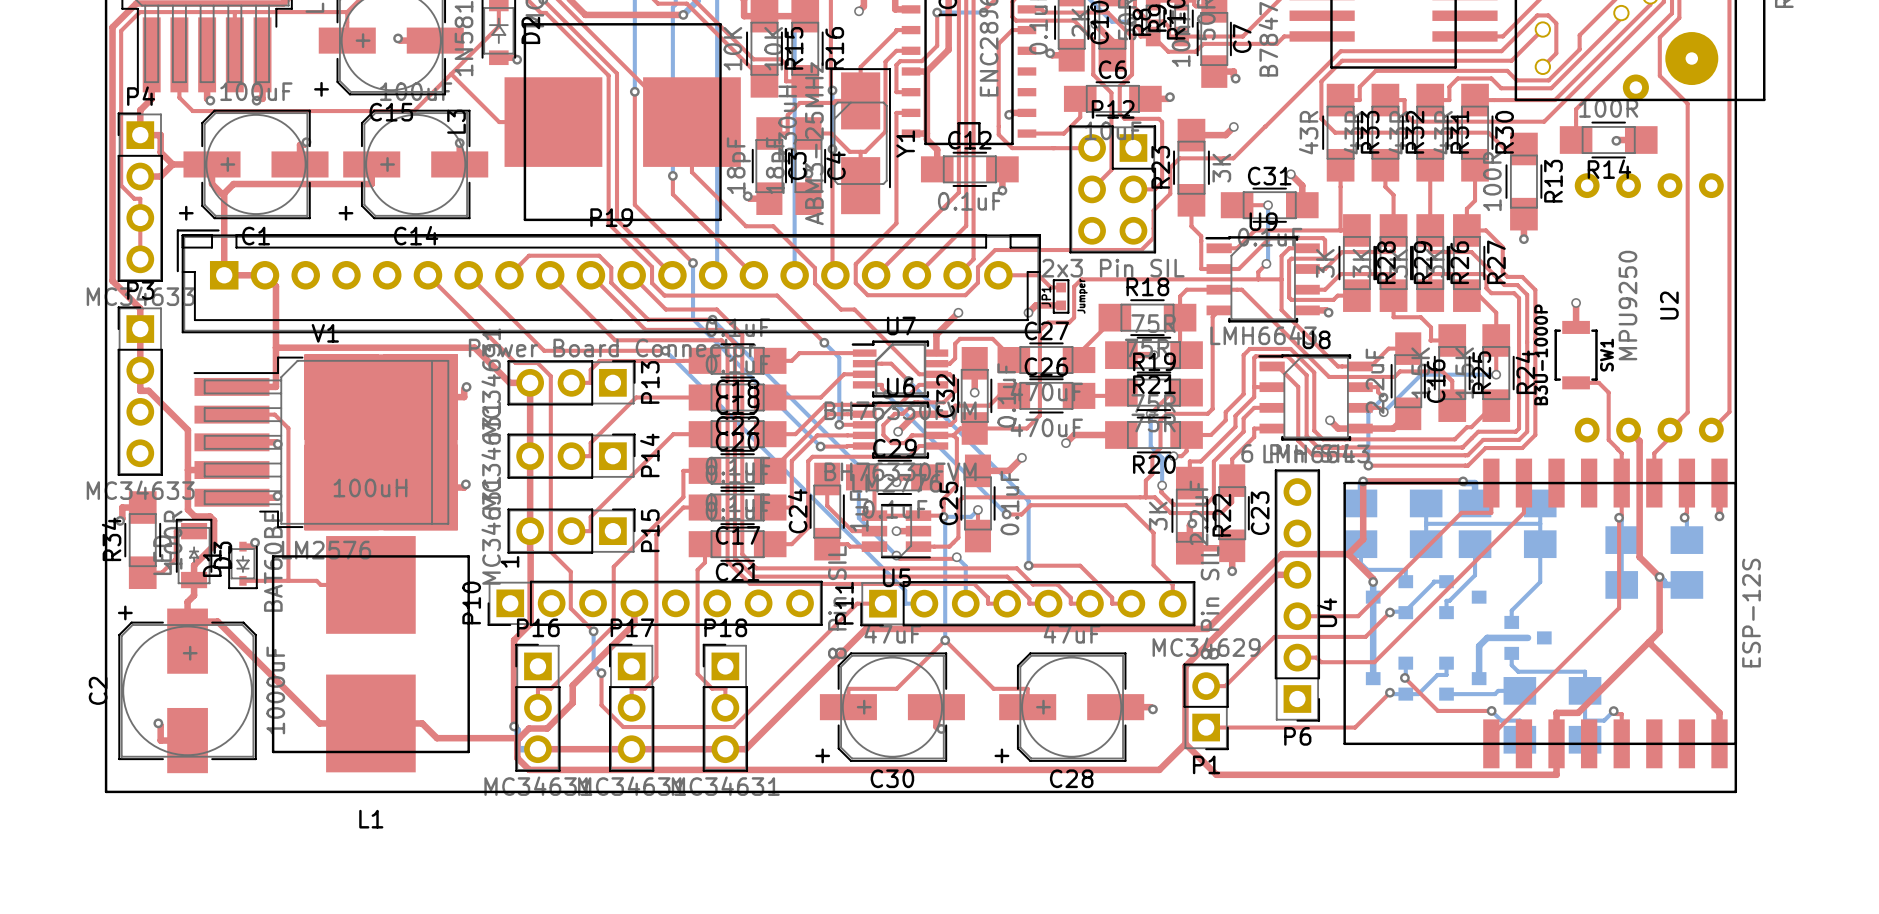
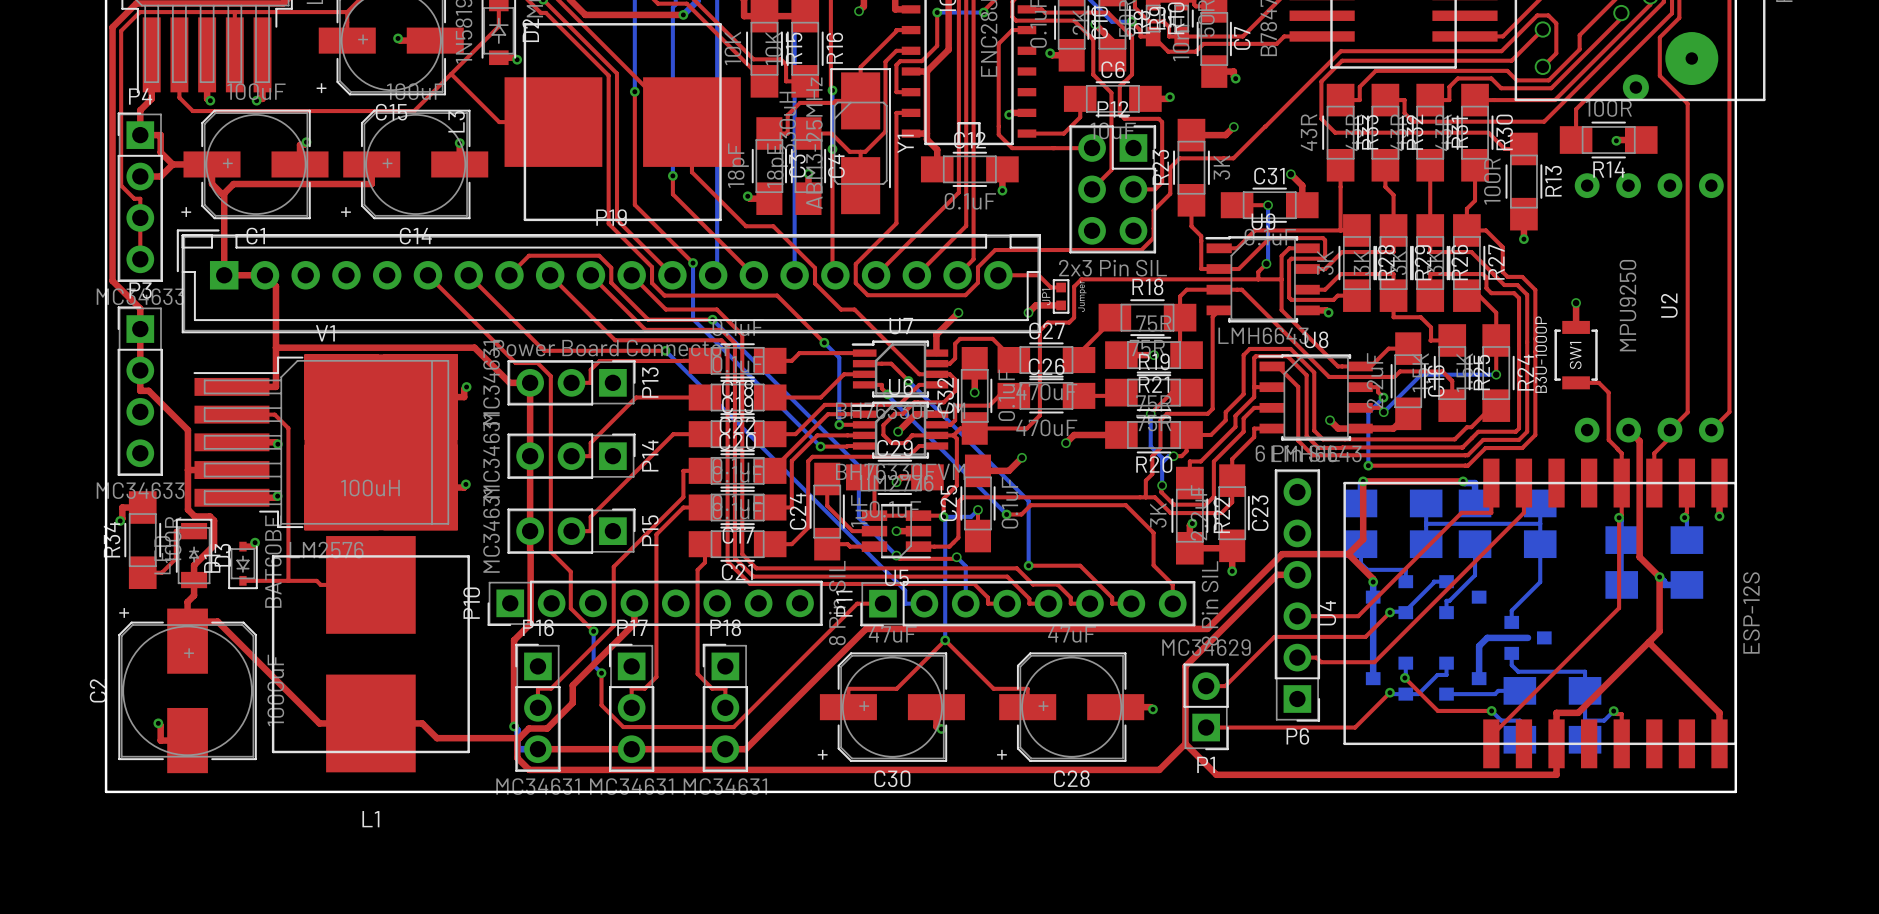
SW1 name position: SW1 (1606, 355) -> SW1 (1575, 355)
text: 1 (509, 561) -> none

